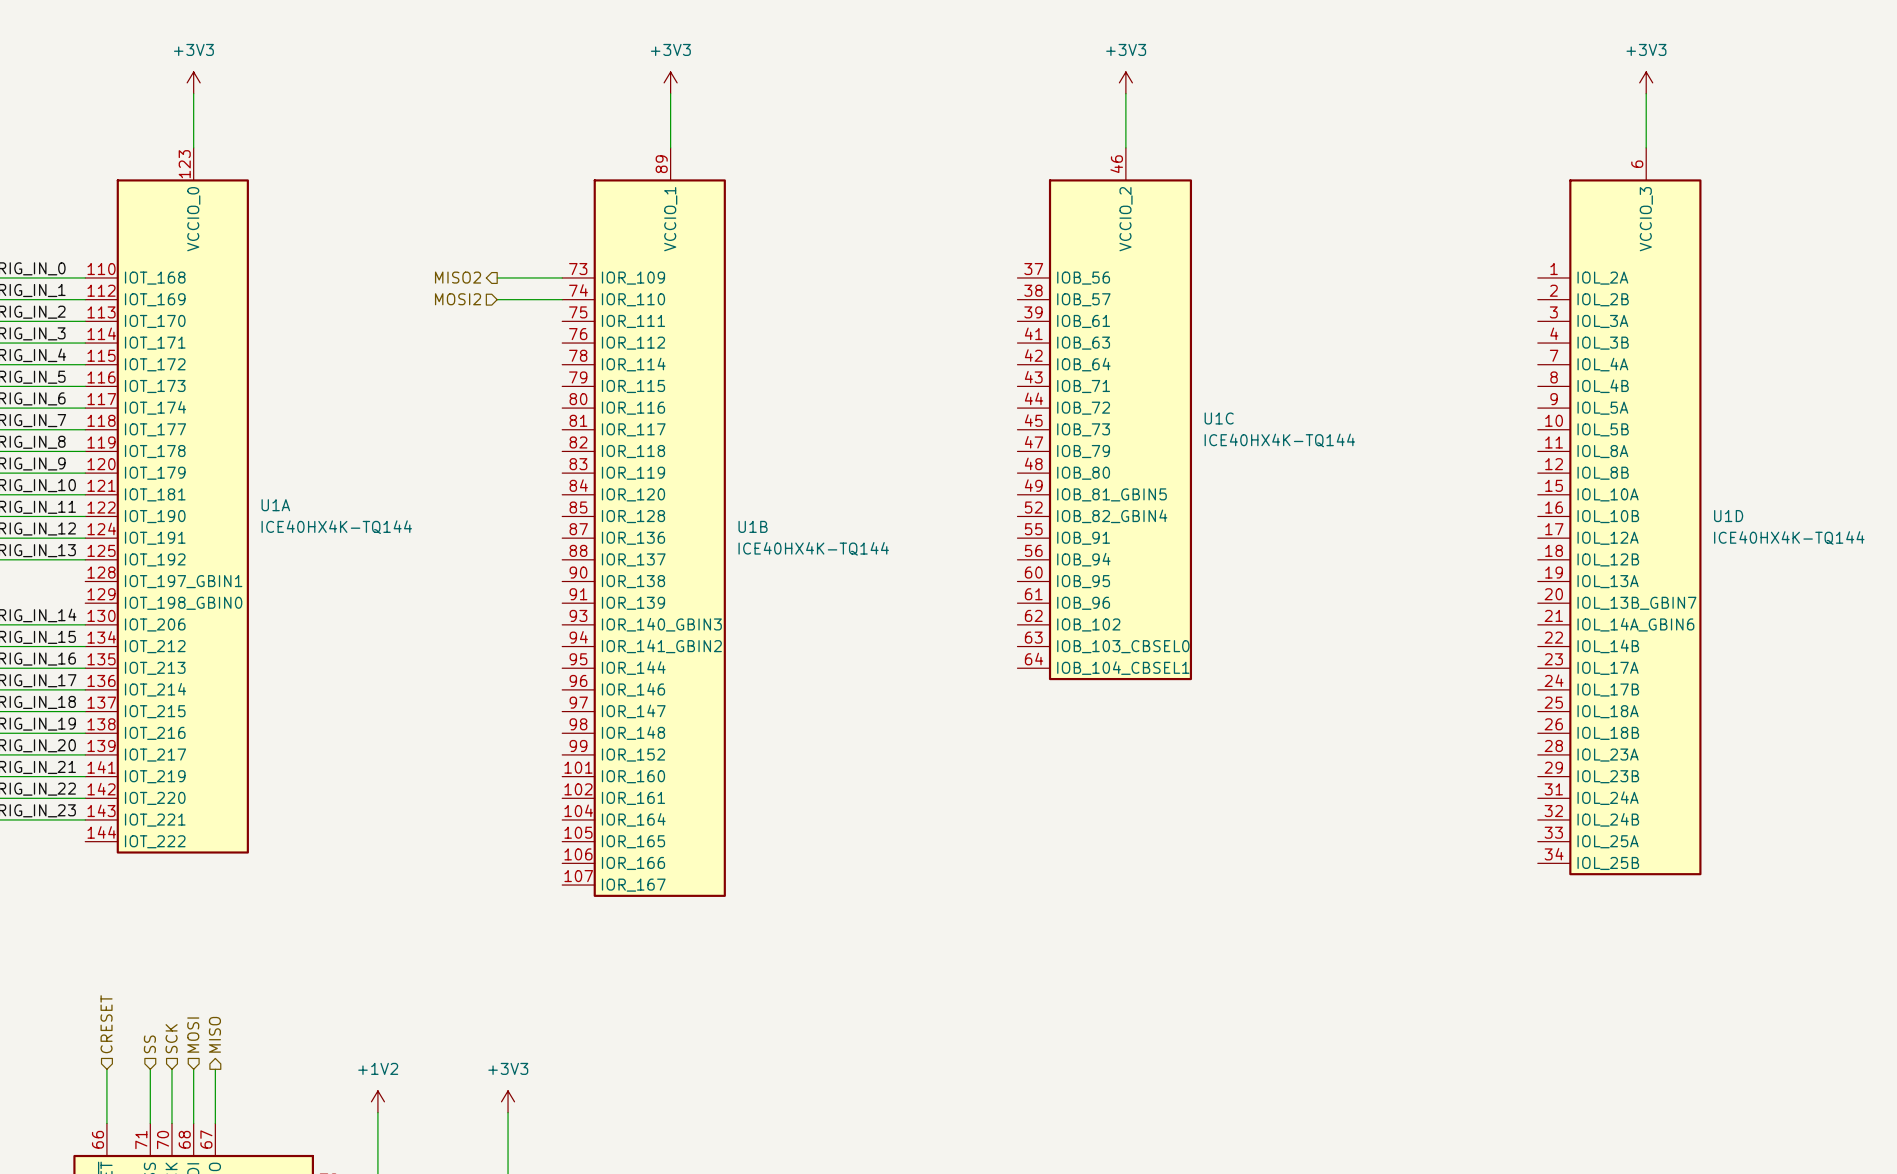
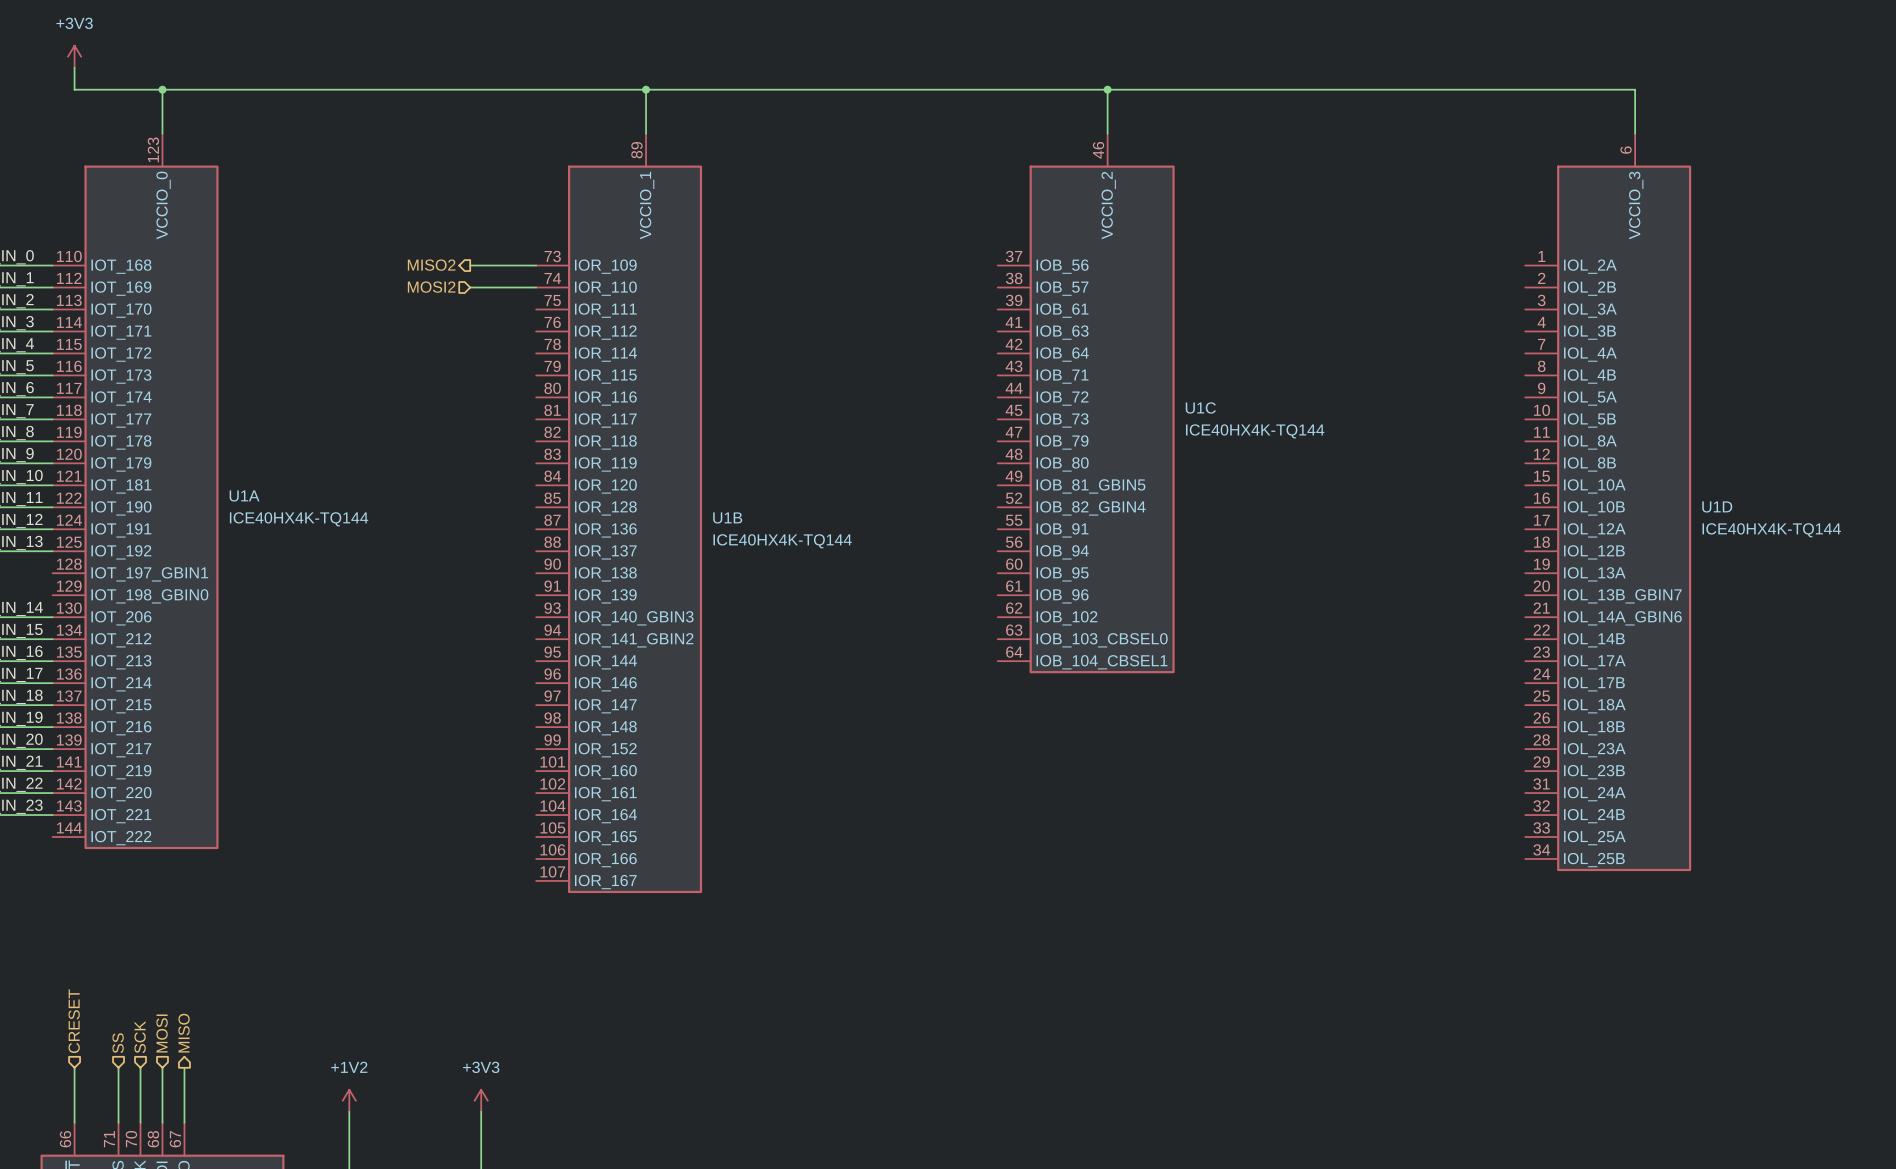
power symbol position: +3V3 (193, 82) -> +3V3 (74, 56)
power symbol: +3V3 (670, 82) -> none
power symbol: +3V3 (1125, 82) -> none
power symbol: +3V3 (1646, 82) -> none
wire: (193, 93) (193, 104) -> none
wire: (670, 93) (670, 104) -> none
wire: (1125, 93) (1125, 104) -> none
wire: (1646, 93) (1646, 104) -> (74, 67) (74, 89) (1635, 89)
junction: none -> (162, 89)
junction: none -> (646, 89)
junction: none -> (1107, 89)

